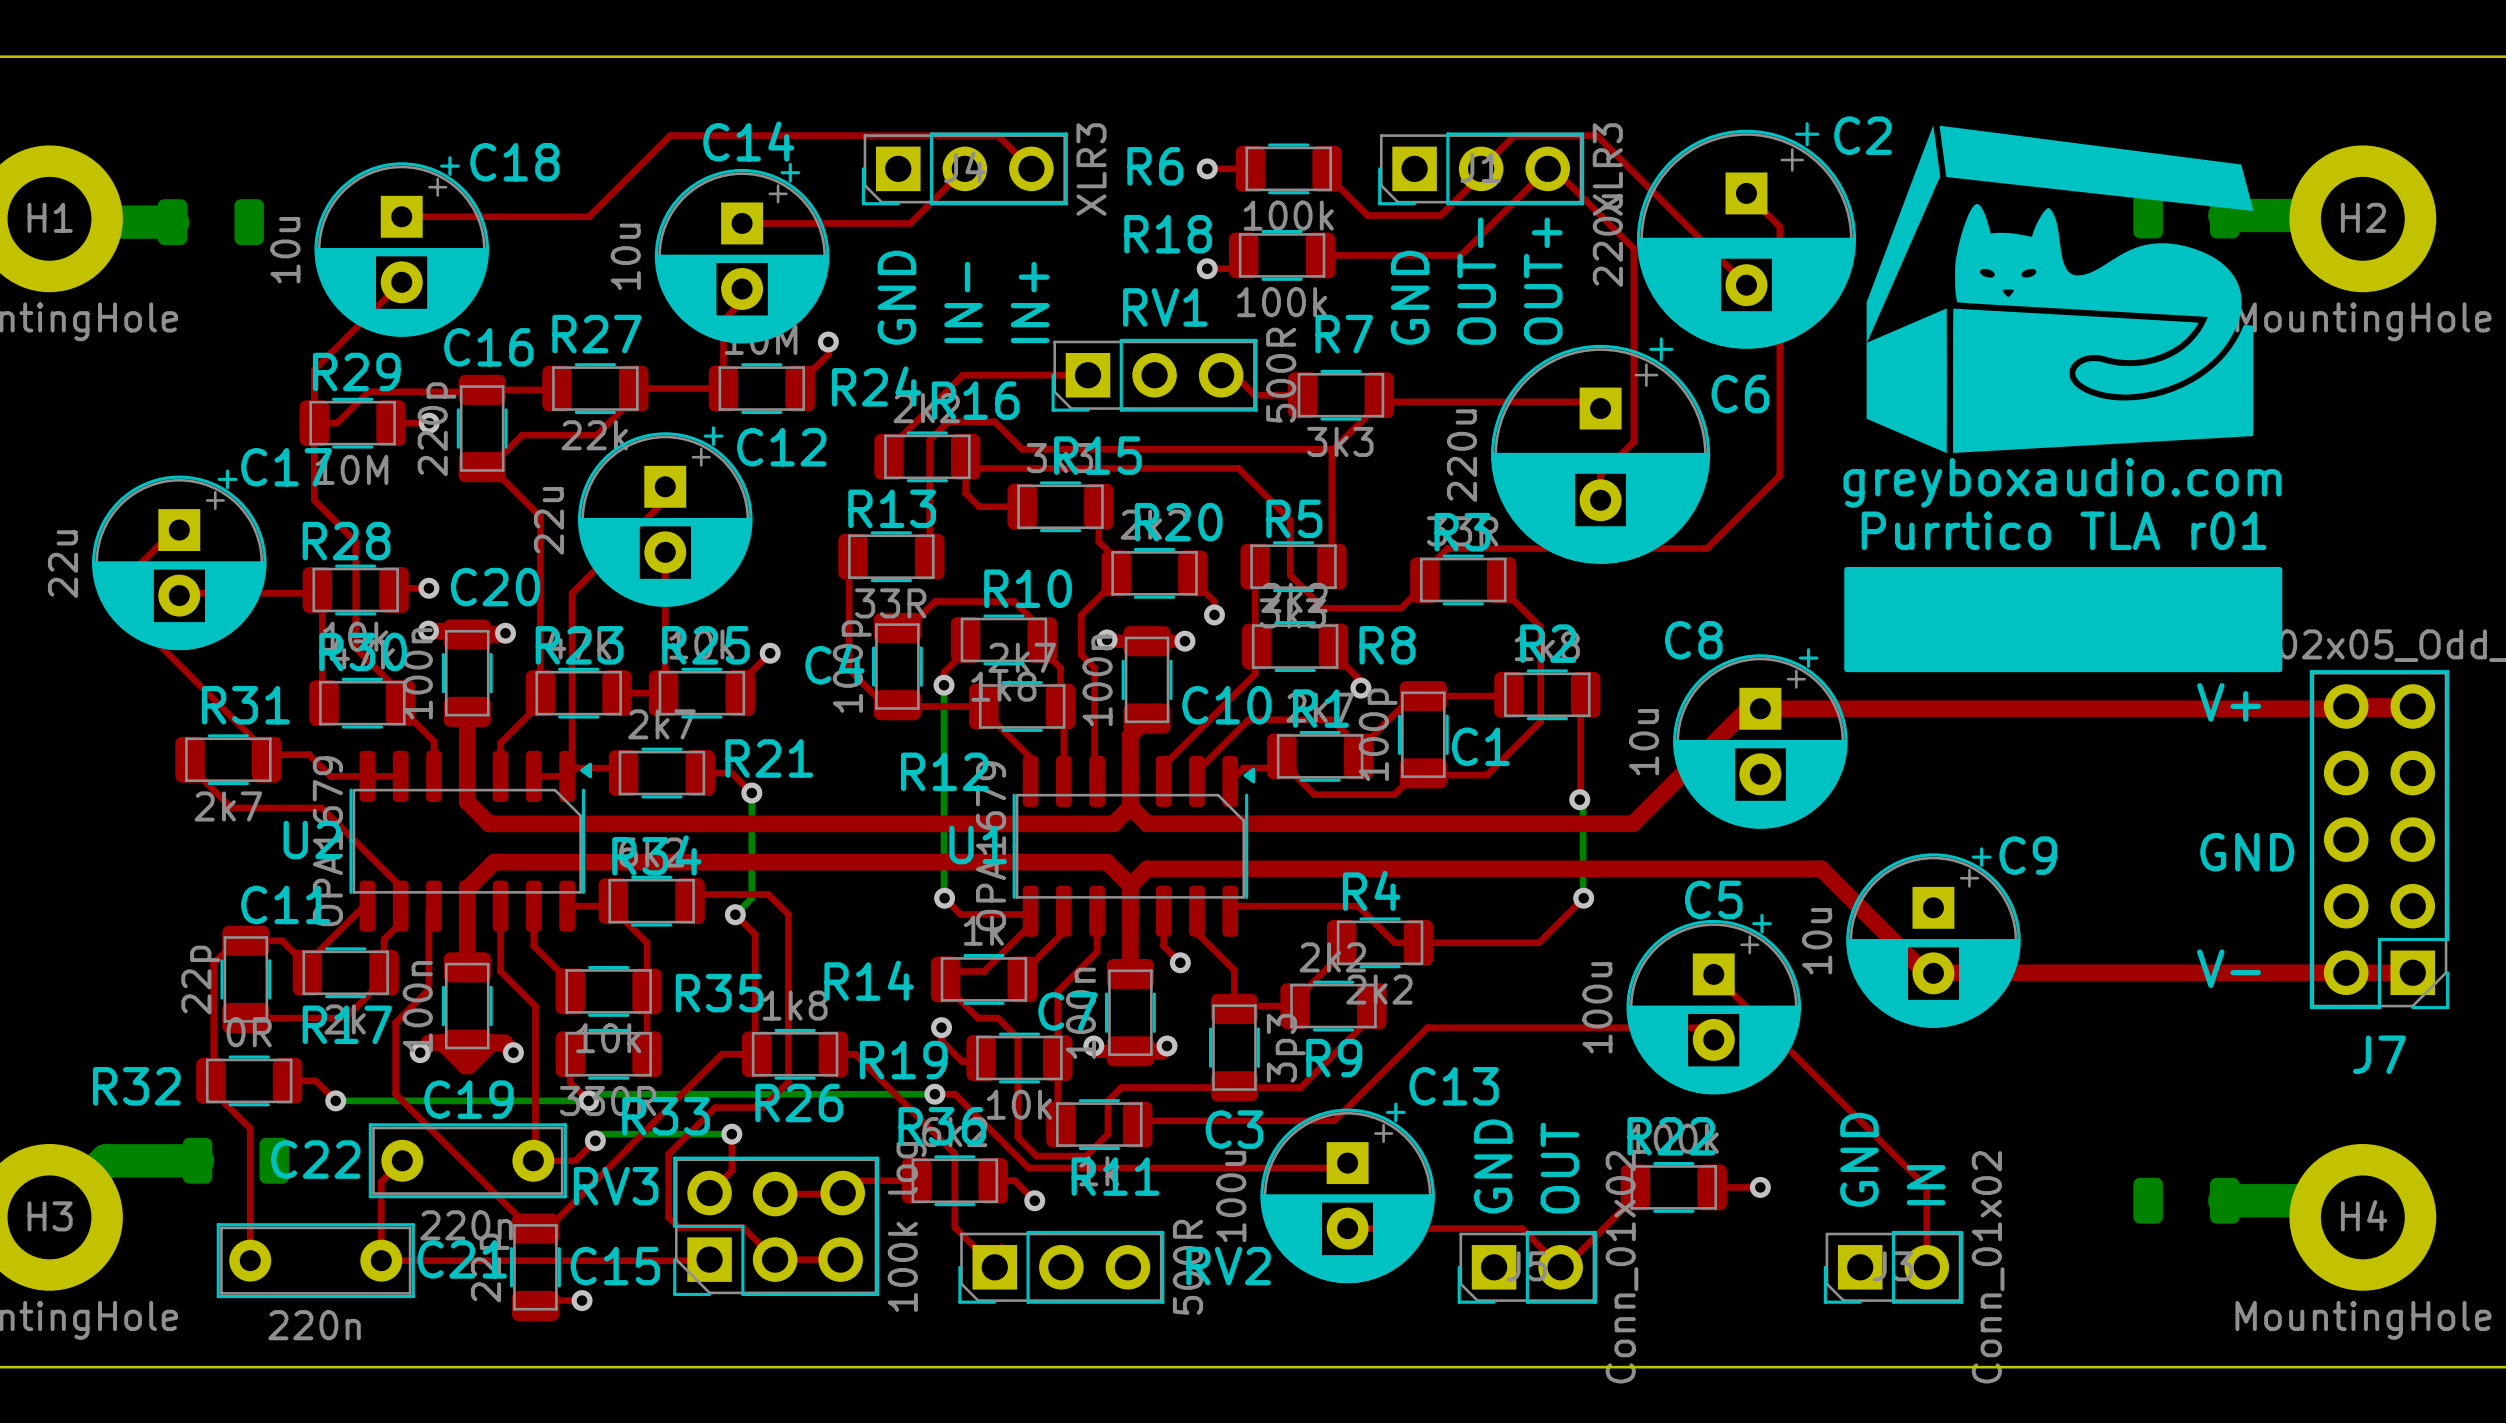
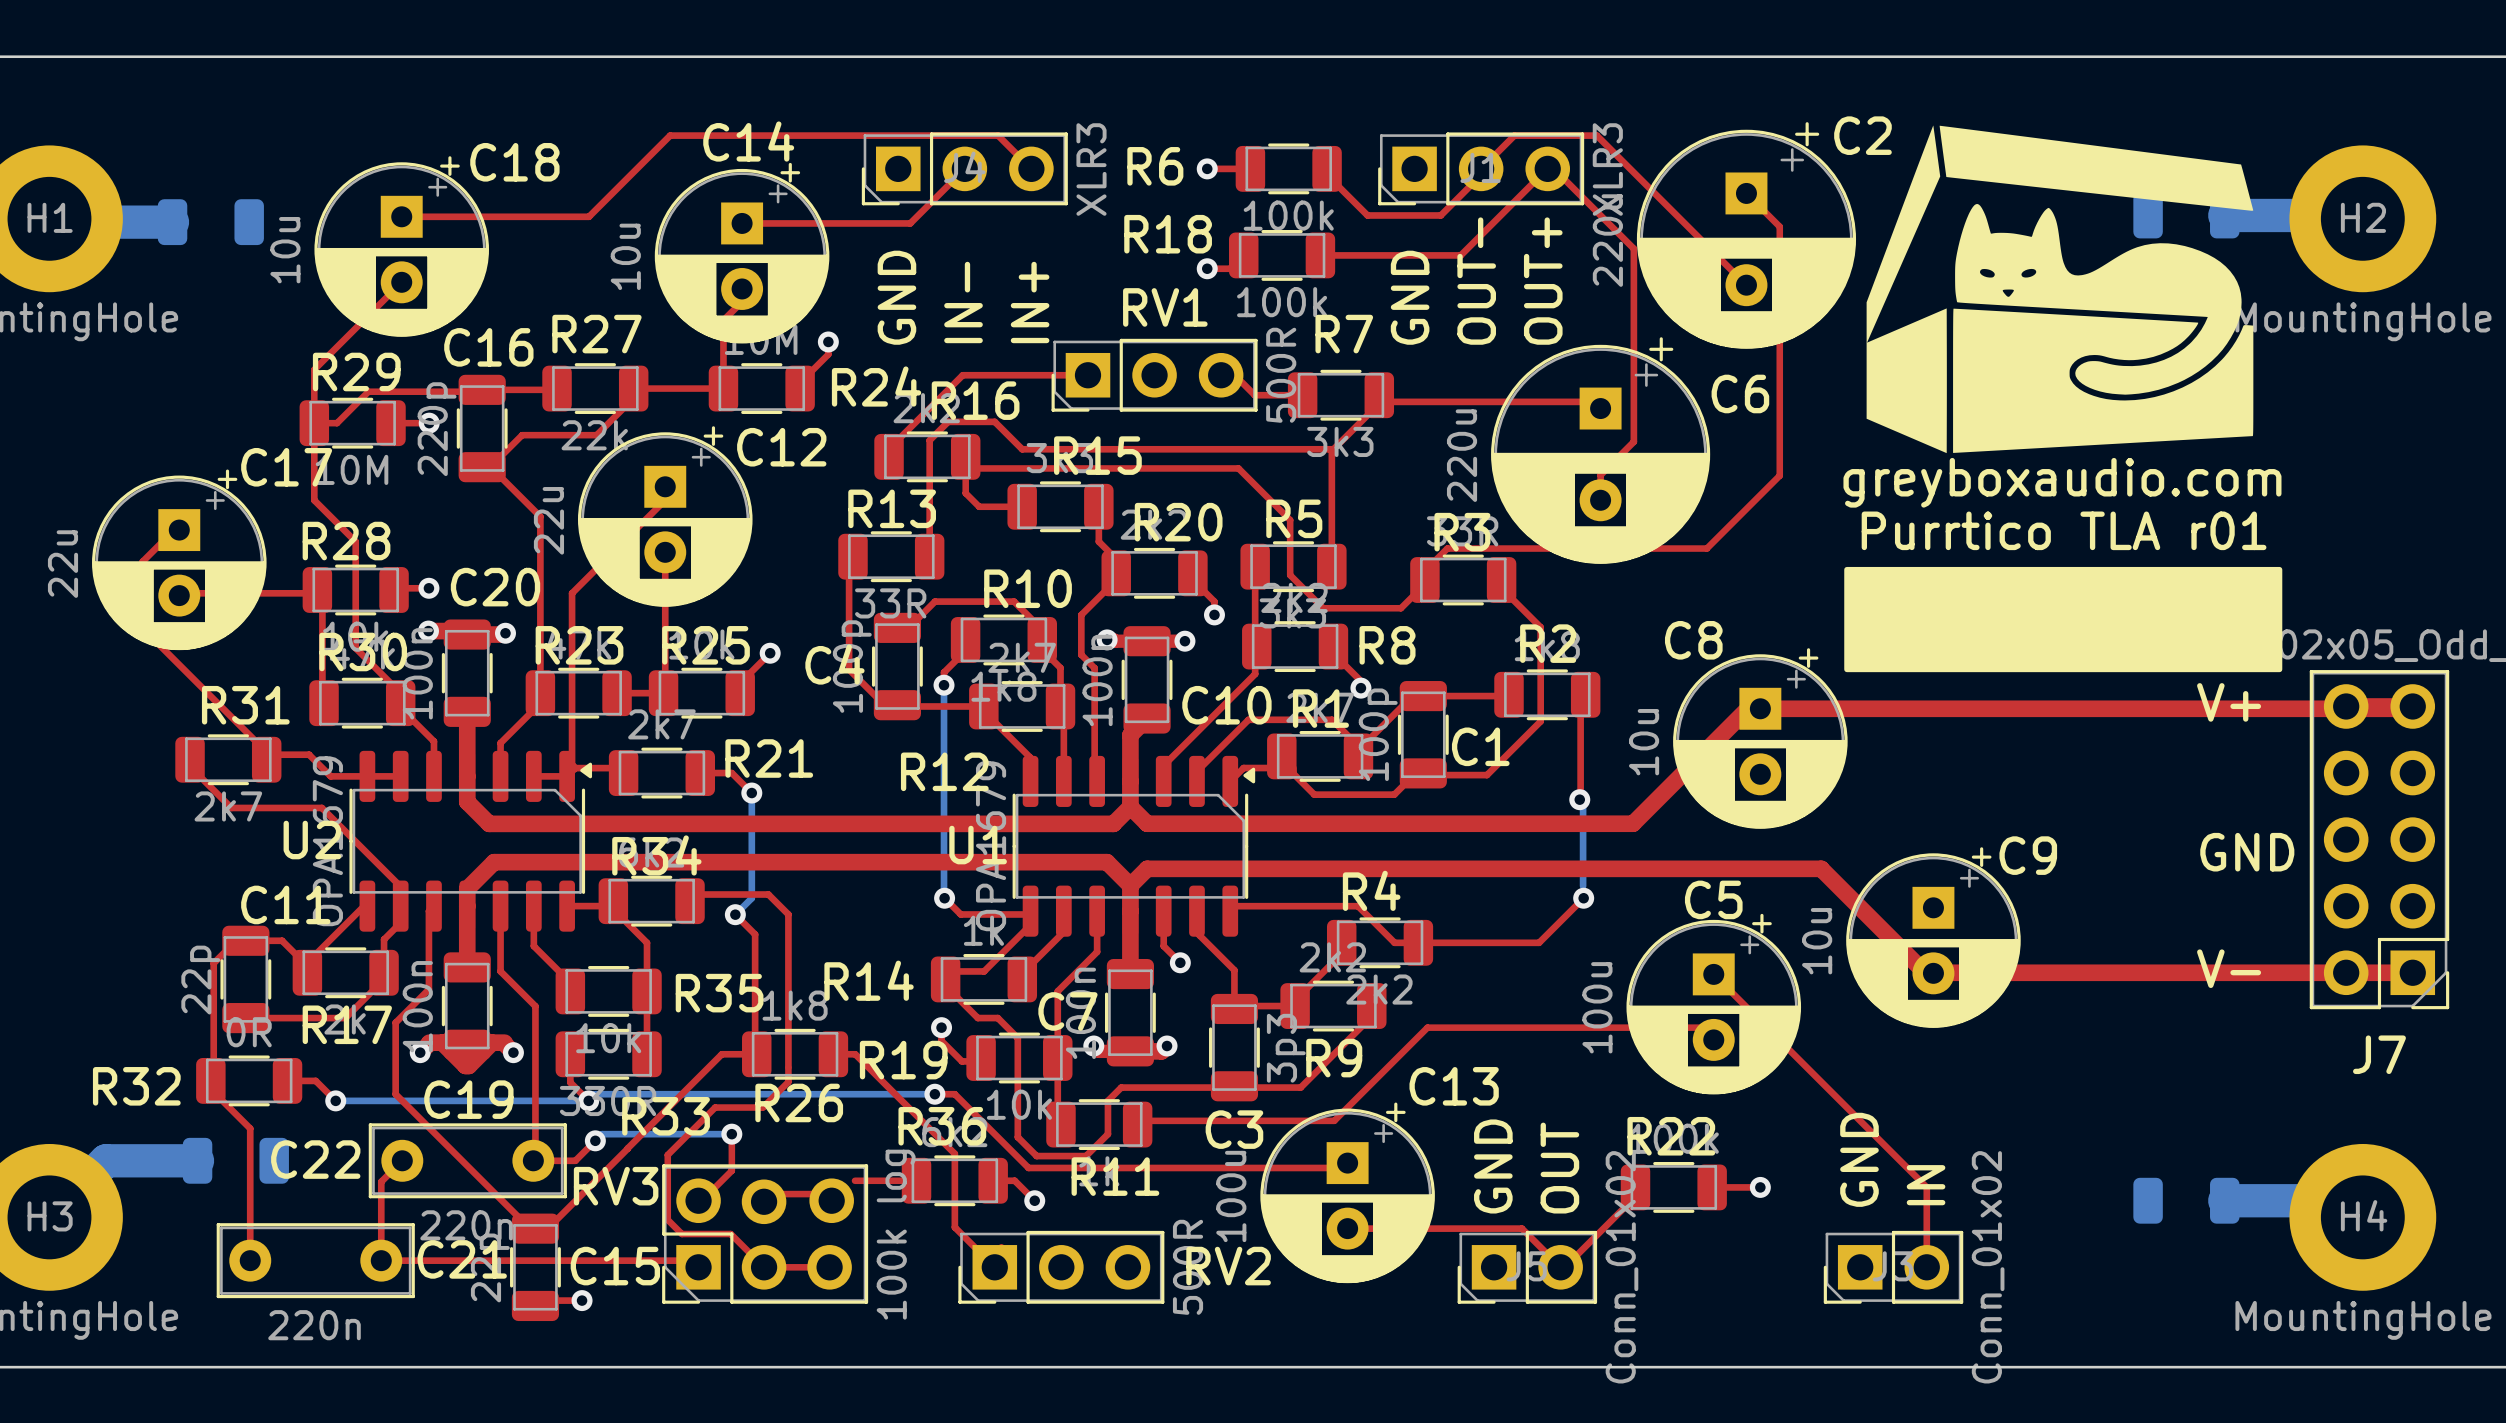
top track: (668, 1154) (668, 1217) (678, 1227) (742, 1227) (775, 1259) (840, 1259) -> (668, 1154) (667, 1219) (681, 1234) (730, 1234) (764, 1267) (829, 1267)
RV3 position: (776, 1226) -> (765, 1234)

